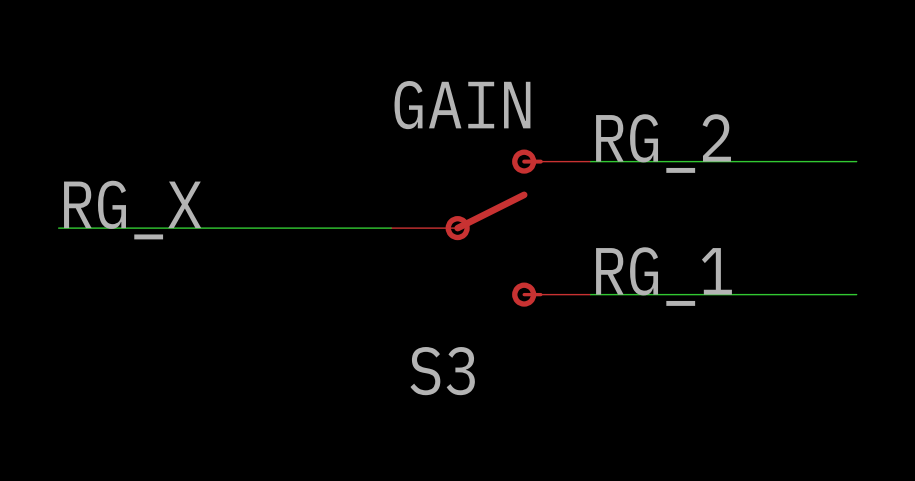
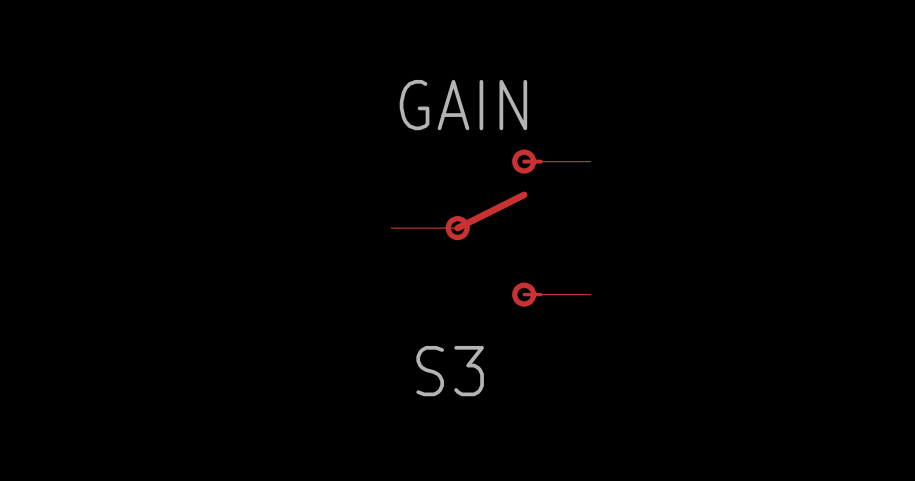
label: RG_2 (663, 143) -> none
wire: (590, 161) (856, 161) -> none
label: RG_X (132, 210) -> none
wire: (58, 228) (391, 228) -> none
label: RG_1 (664, 276) -> none
wire: (590, 294) (856, 294) -> none

